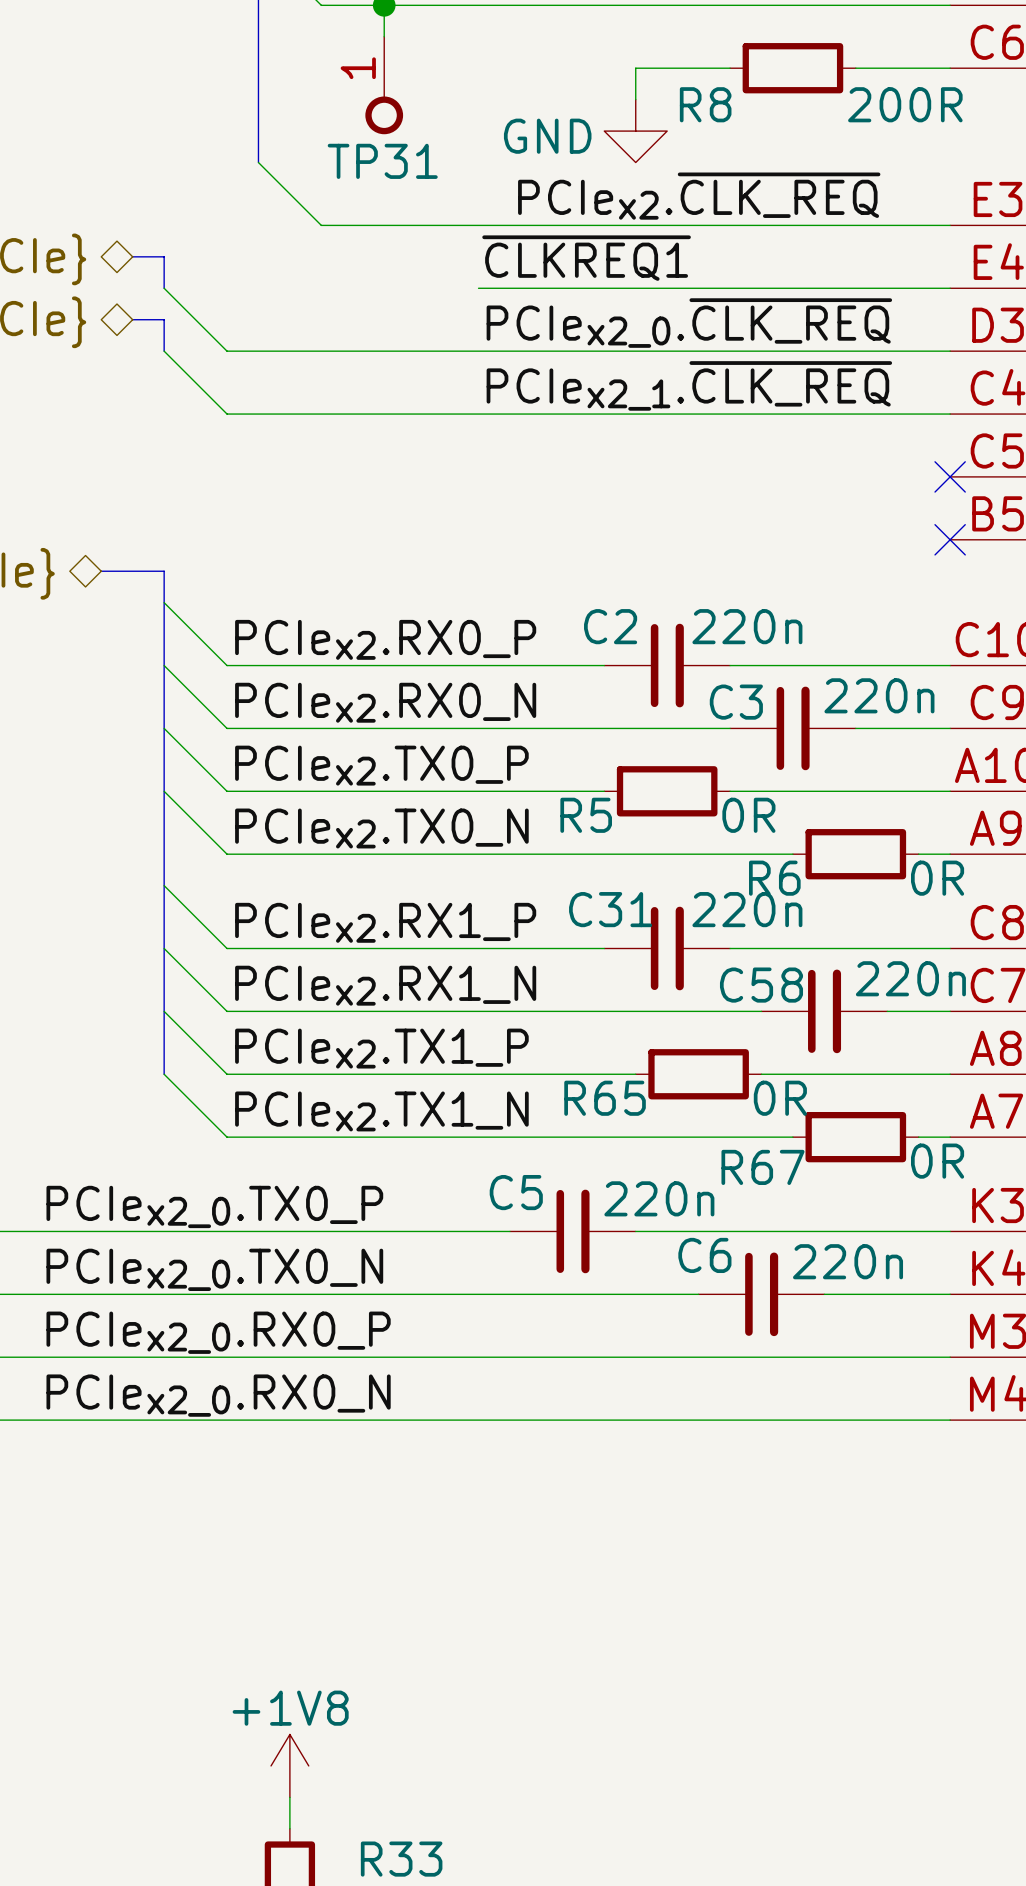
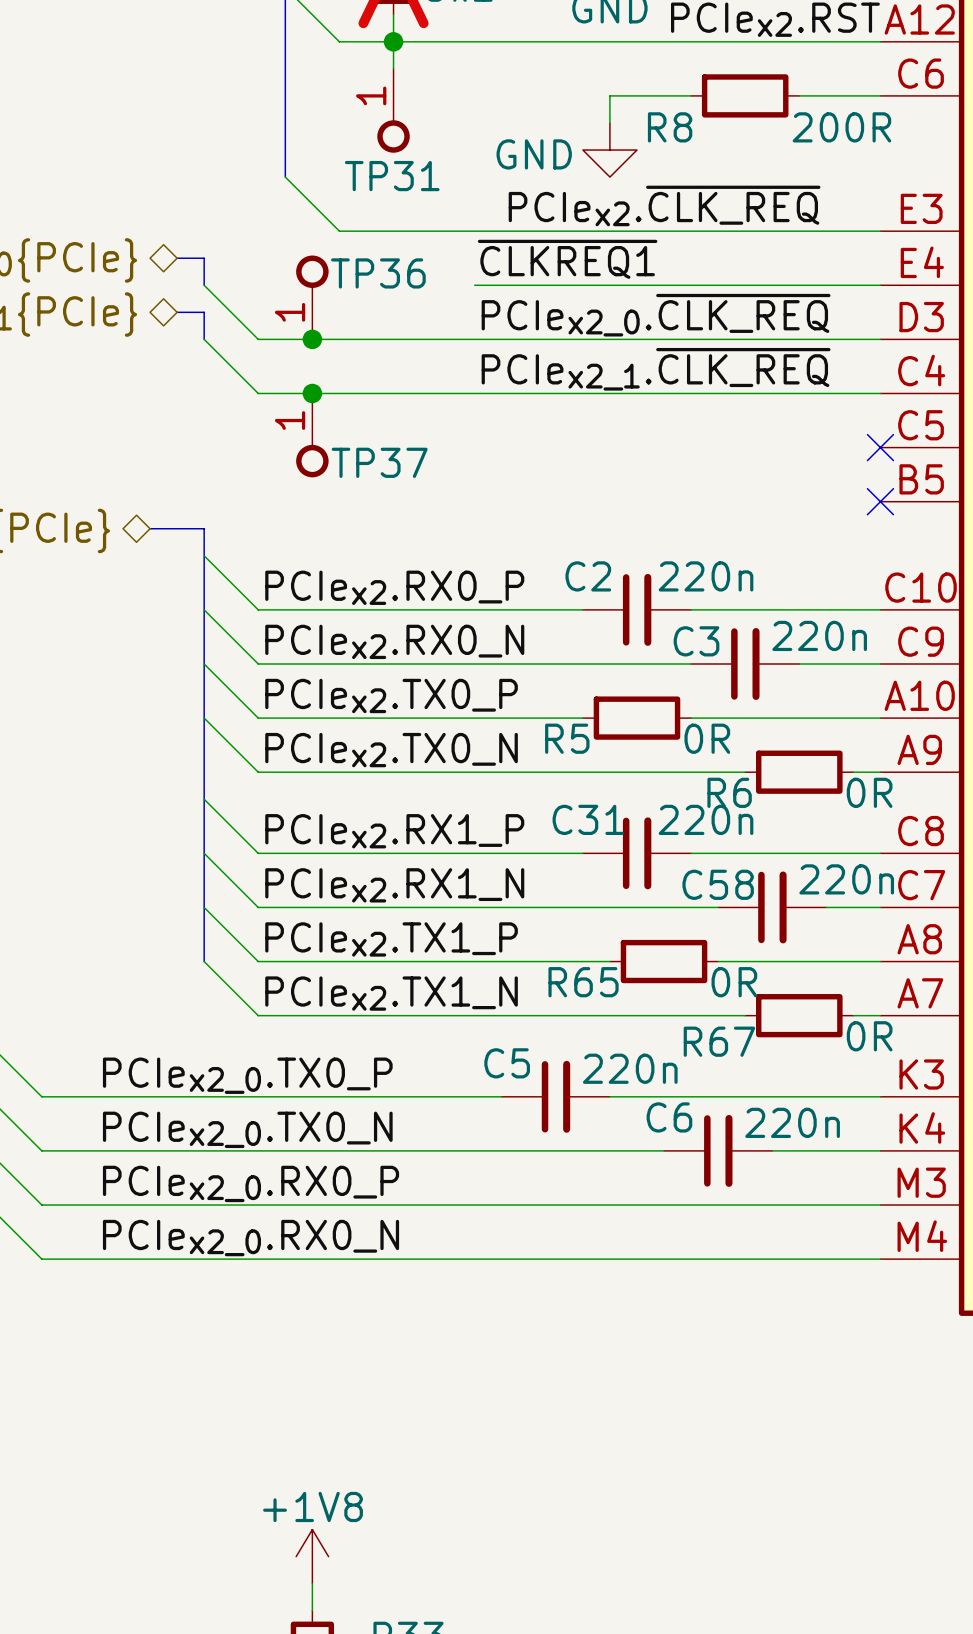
TP36: none -> (312, 297)
junction: none -> (312, 339)
junction: none -> (312, 393)
TP37: none -> (312, 435)

